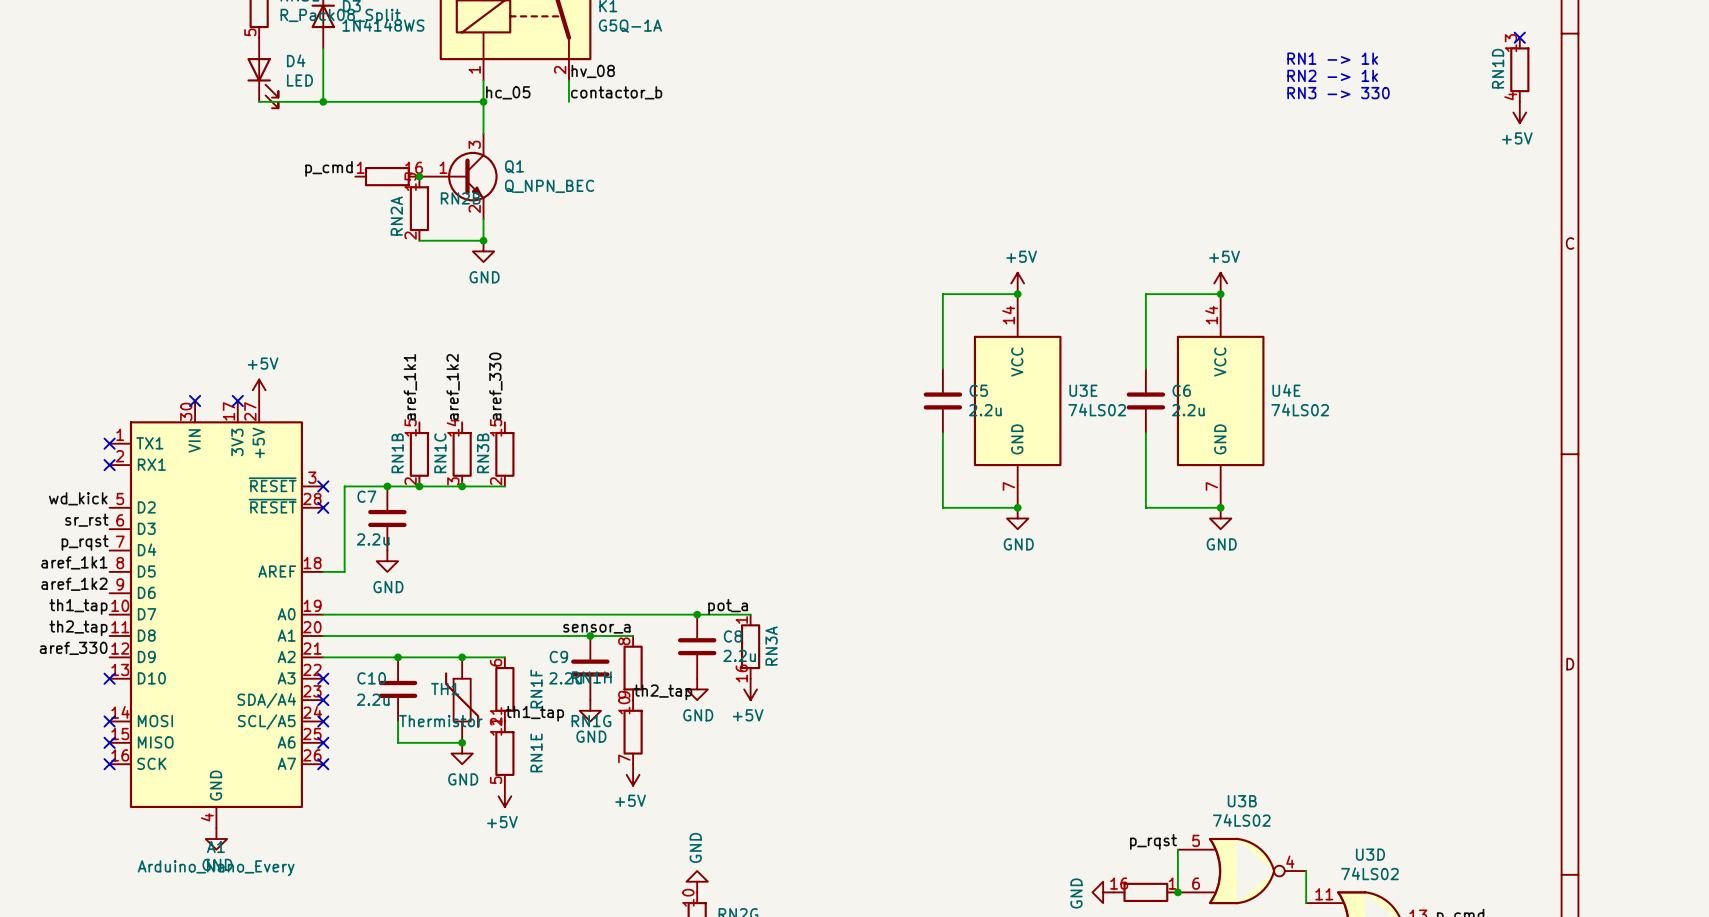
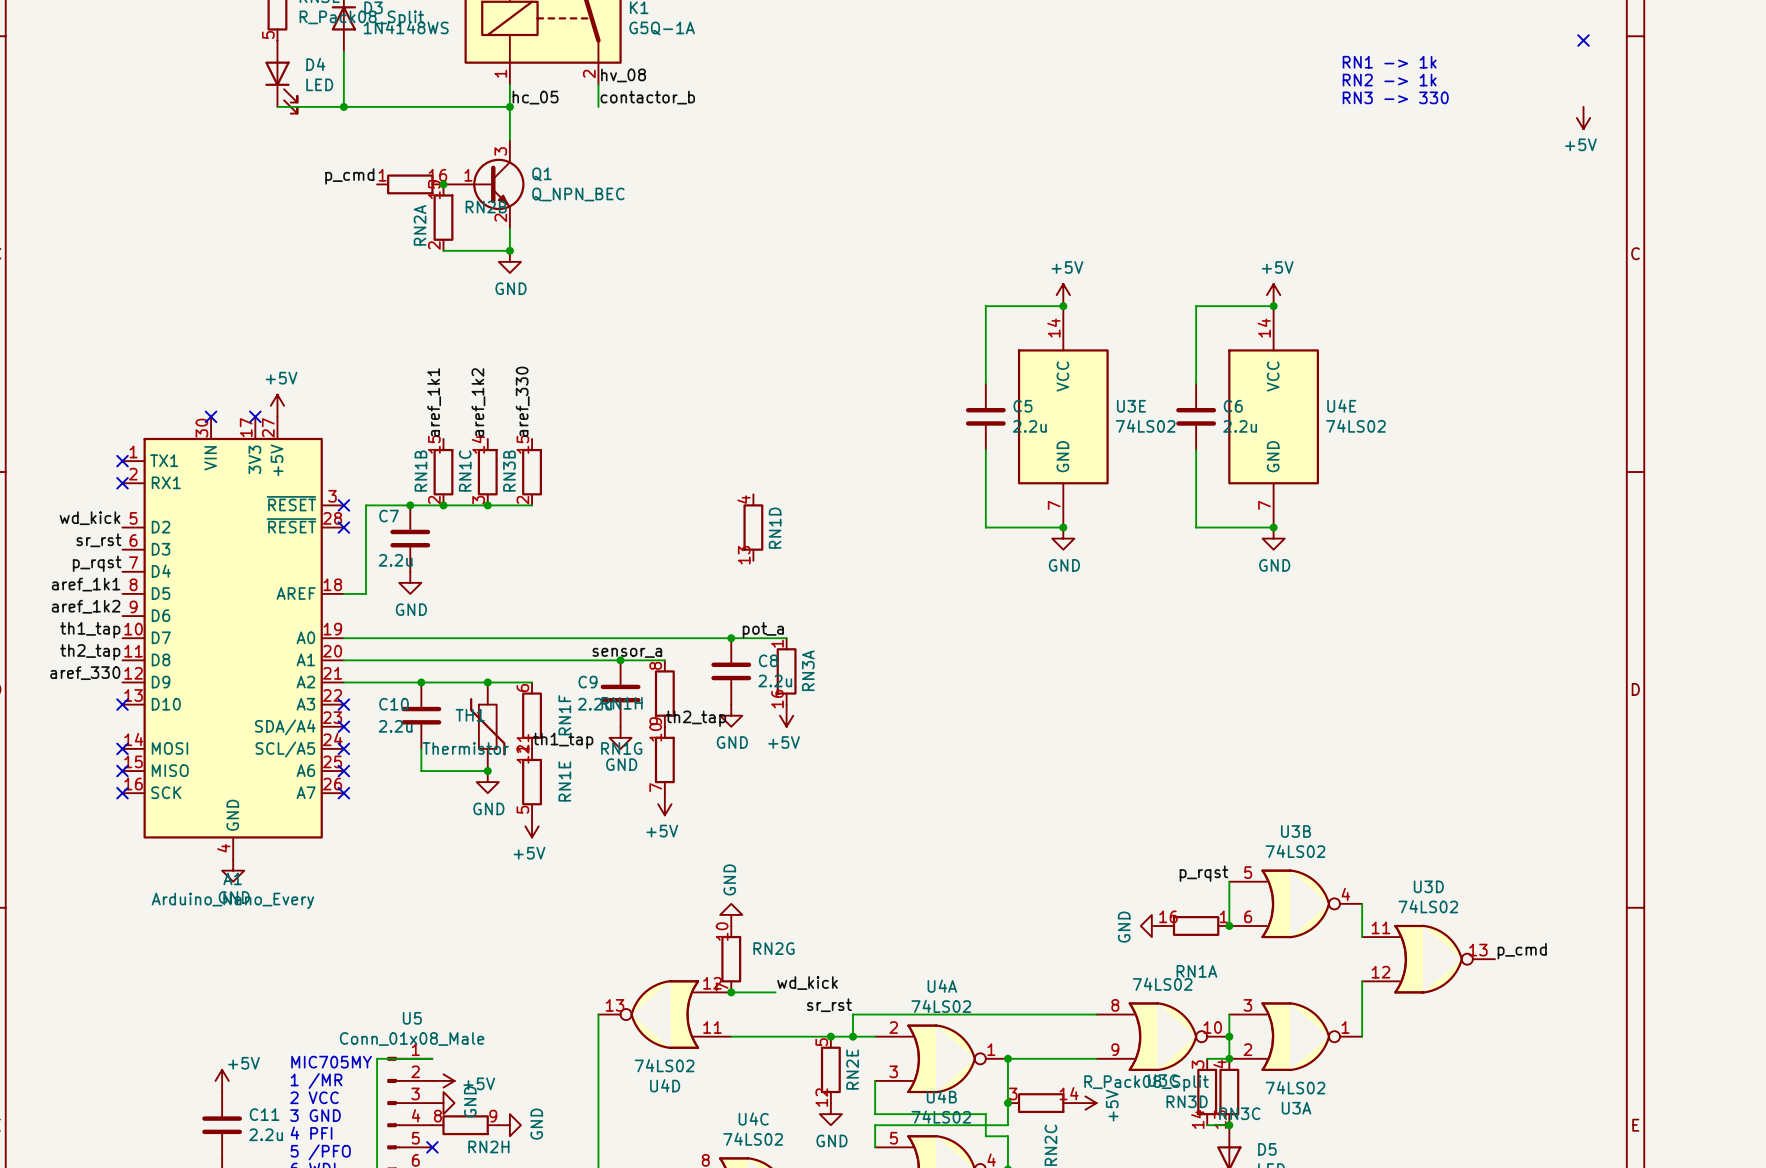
RN1D rotation: 0° (1519, 69) -> 180° (753, 527)
RN1D position: (1519, 69) -> (753, 527)

